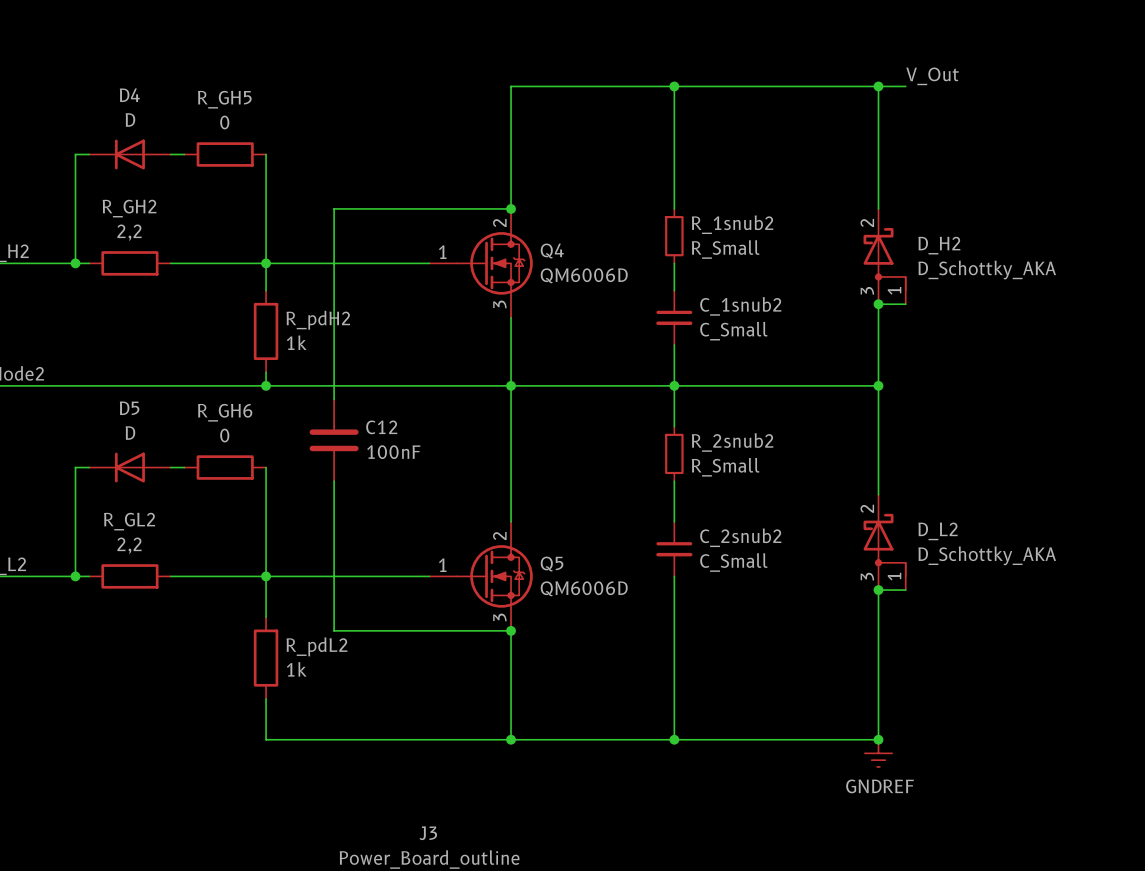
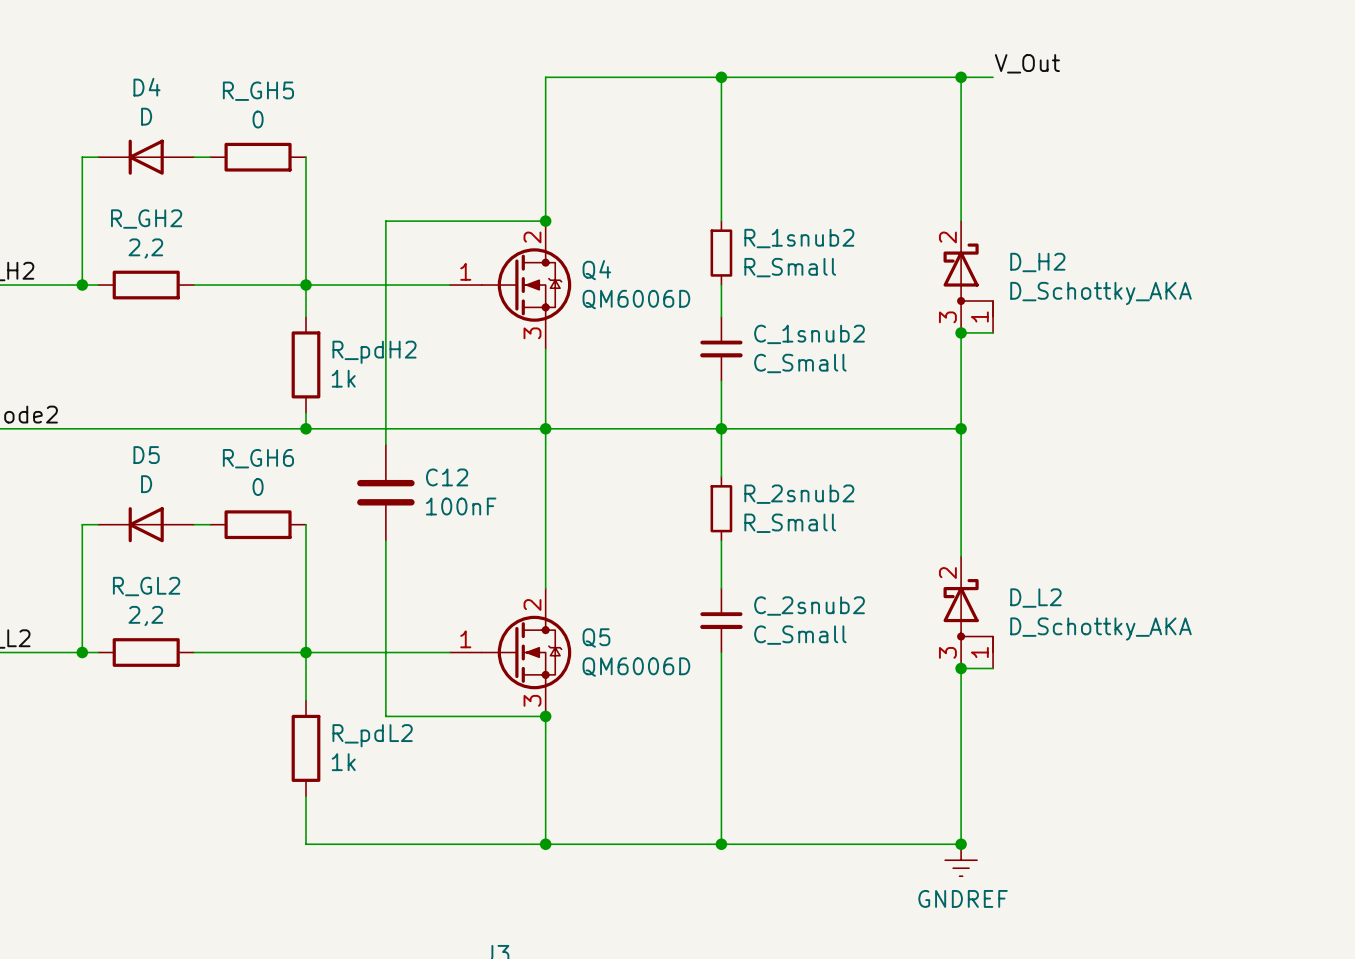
label position: V_Out (932, 76) -> V_Out (1027, 63)
wire: (511, 86) (511, 208) (470, 208) -> (593, 77) (545, 77) (545, 221)
wire: (674, 86) (674, 208) -> (721, 77) (721, 221)
junction position: (674, 86) -> (721, 77)
wire: (851, 86) (905, 86) -> none
wire: (878, 86) (878, 208) -> (961, 77) (961, 221)
junction position: (878, 86) -> (961, 77)
junction position: (511, 208) -> (545, 221)
R_1snub2 position: (674, 236) -> (721, 253)
D_H2 position: (884, 256) -> (968, 277)
Q4 position: (481, 263) -> (510, 285)
wire: (674, 263) (674, 290) -> (721, 285) (721, 316)
junction: none -> (961, 332)
junction: (878, 304) -> none
wire: (905, 304) (878, 304) (878, 494) -> (993, 332) (961, 332) (961, 556)
wire: (511, 317) (511, 521) -> (545, 348) (545, 588)
C_1snub2 position: (674, 317) -> (721, 348)
wire: (674, 345) (674, 426) -> (721, 380) (721, 476)
junction position: (511, 385) -> (545, 428)
junction: none -> (721, 428)
junction: (674, 385) -> none
wire: (824, 385) (878, 385) -> none
junction: none -> (961, 428)
junction: (878, 385) -> none
R_2snub2 position: (674, 453) -> (721, 508)
wire: (674, 481) (674, 521) -> (721, 540) (721, 588)
D_L2 position: (884, 542) -> (968, 612)
C_2snub2 position: (674, 549) -> (721, 620)
Q5 position: (481, 576) -> (510, 652)
wire: (674, 576) (674, 739) -> (721, 652) (721, 844)
junction position: (878, 590) -> (961, 668)
wire: (905, 590) (878, 590) (878, 739) (824, 739) -> (993, 668) (961, 668) (961, 844)
wire: (470, 630) (511, 630) (511, 739) -> (545, 716) (545, 844)
junction position: (511, 630) -> (545, 716)
junction position: (511, 739) -> (545, 844)
junction: none -> (721, 844)
junction: (674, 739) -> none
junction position: (878, 739) -> (961, 844)
power symbol position: GNDREF (878, 753) -> GNDREF (961, 860)

